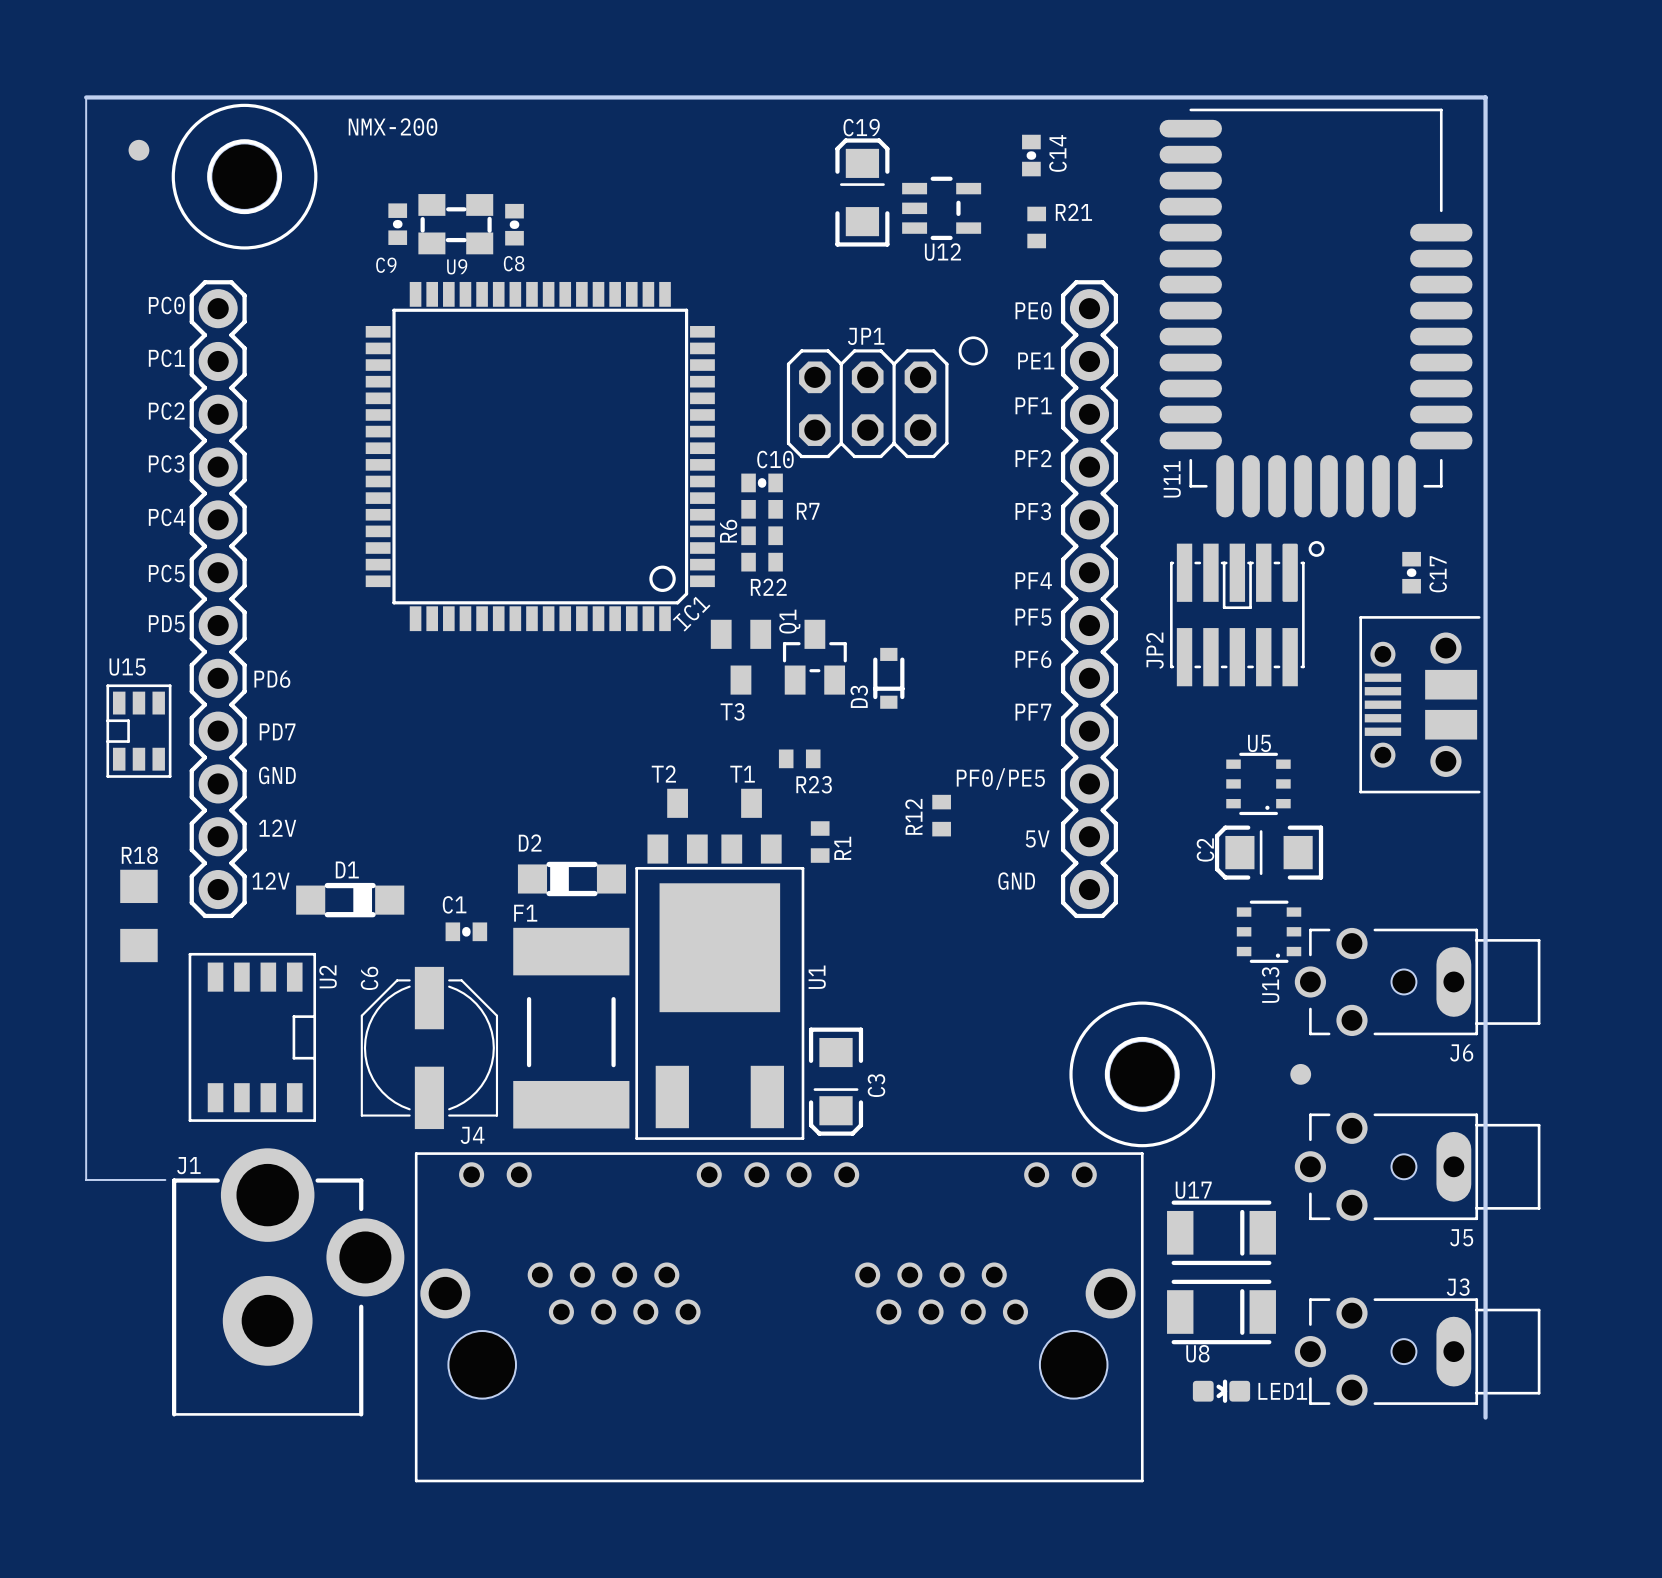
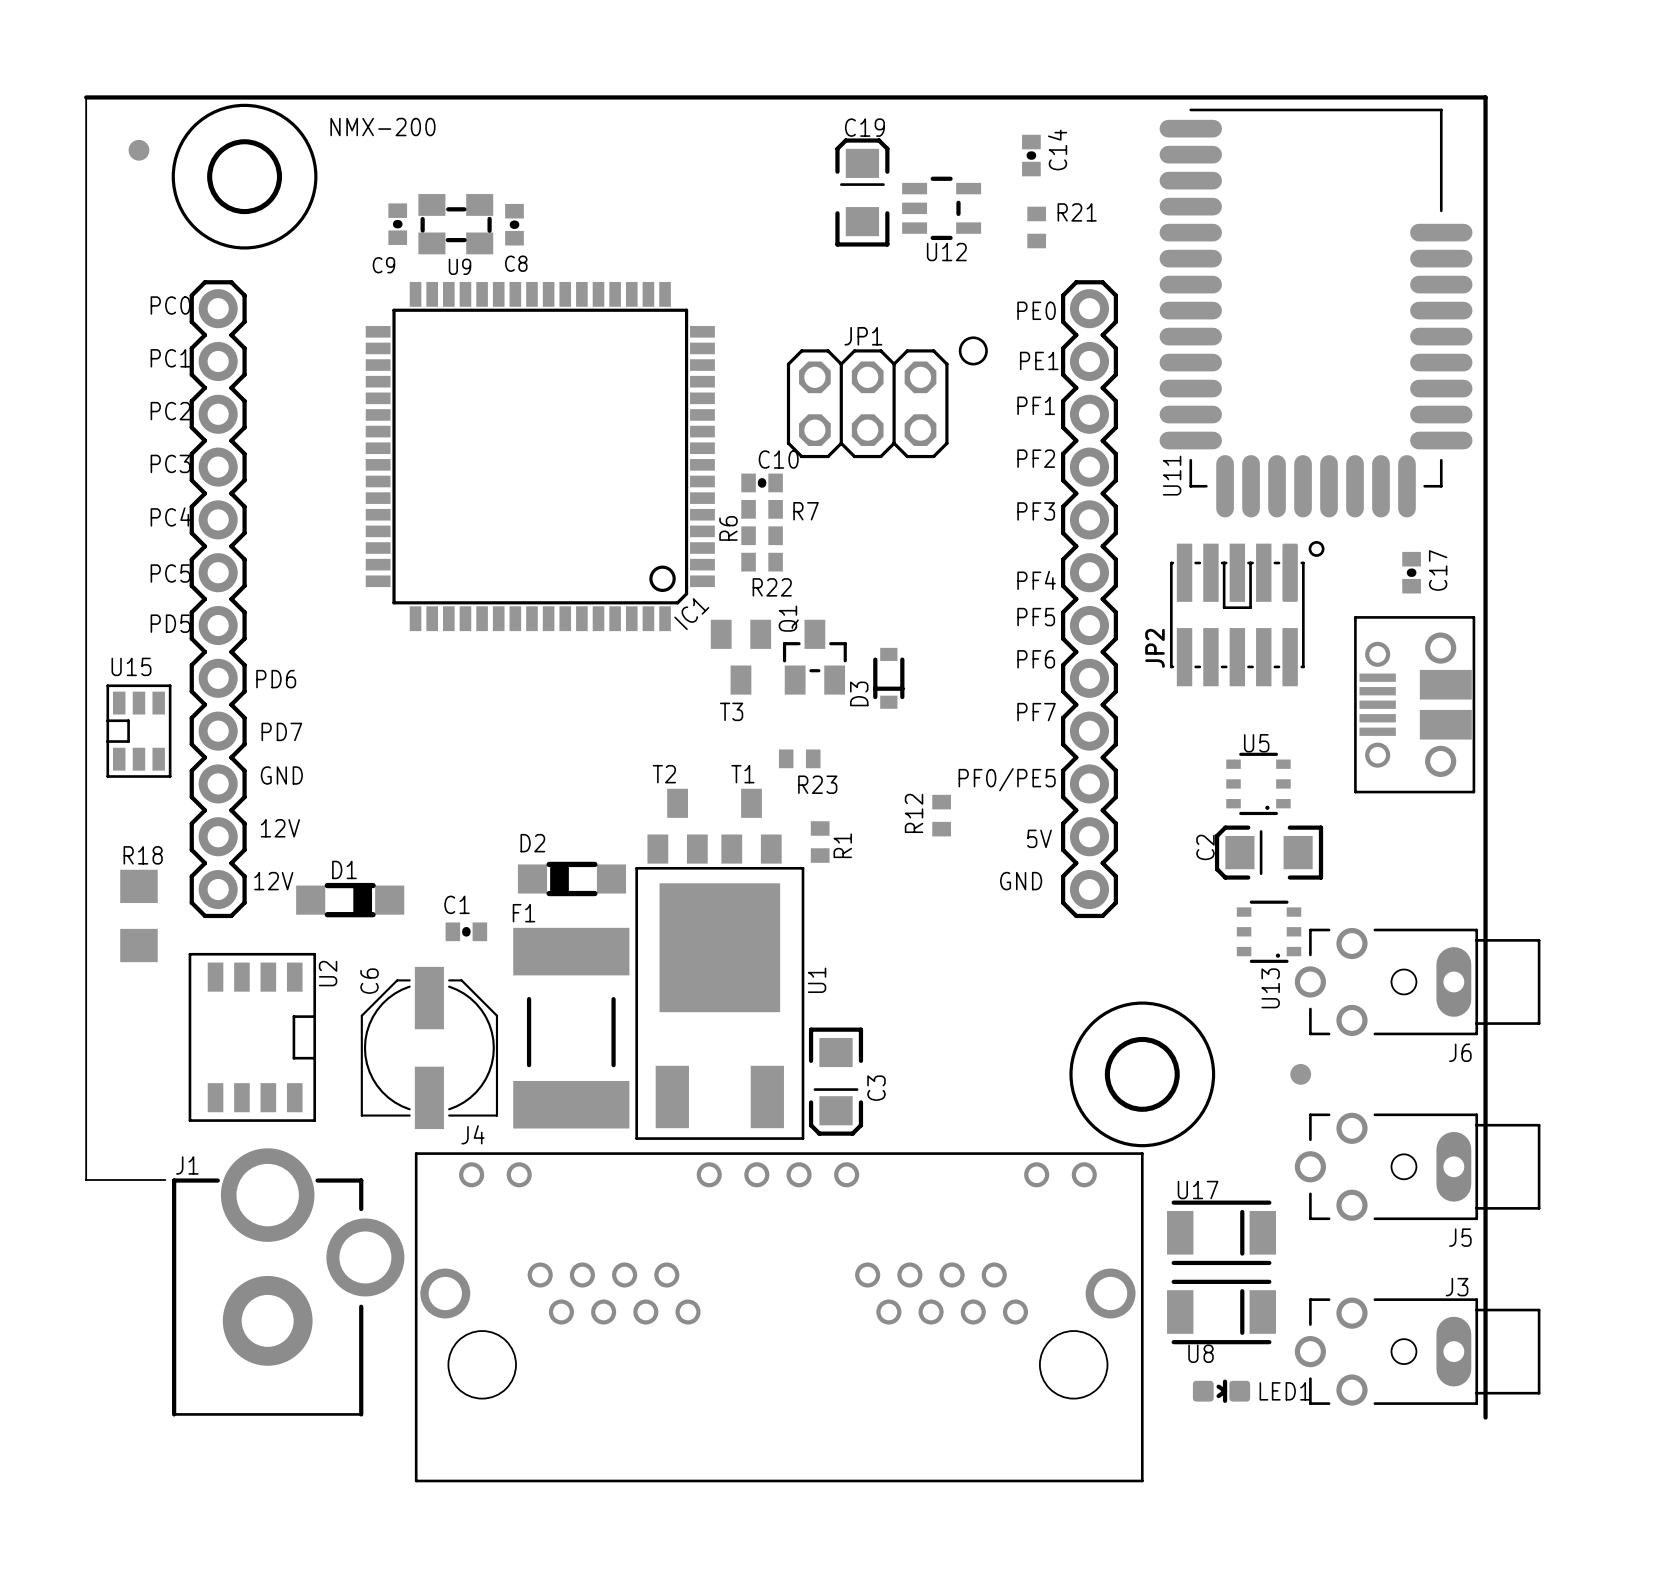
part footprint: [1359, 616, 1481, 794] -> [1354, 616, 1476, 794]

